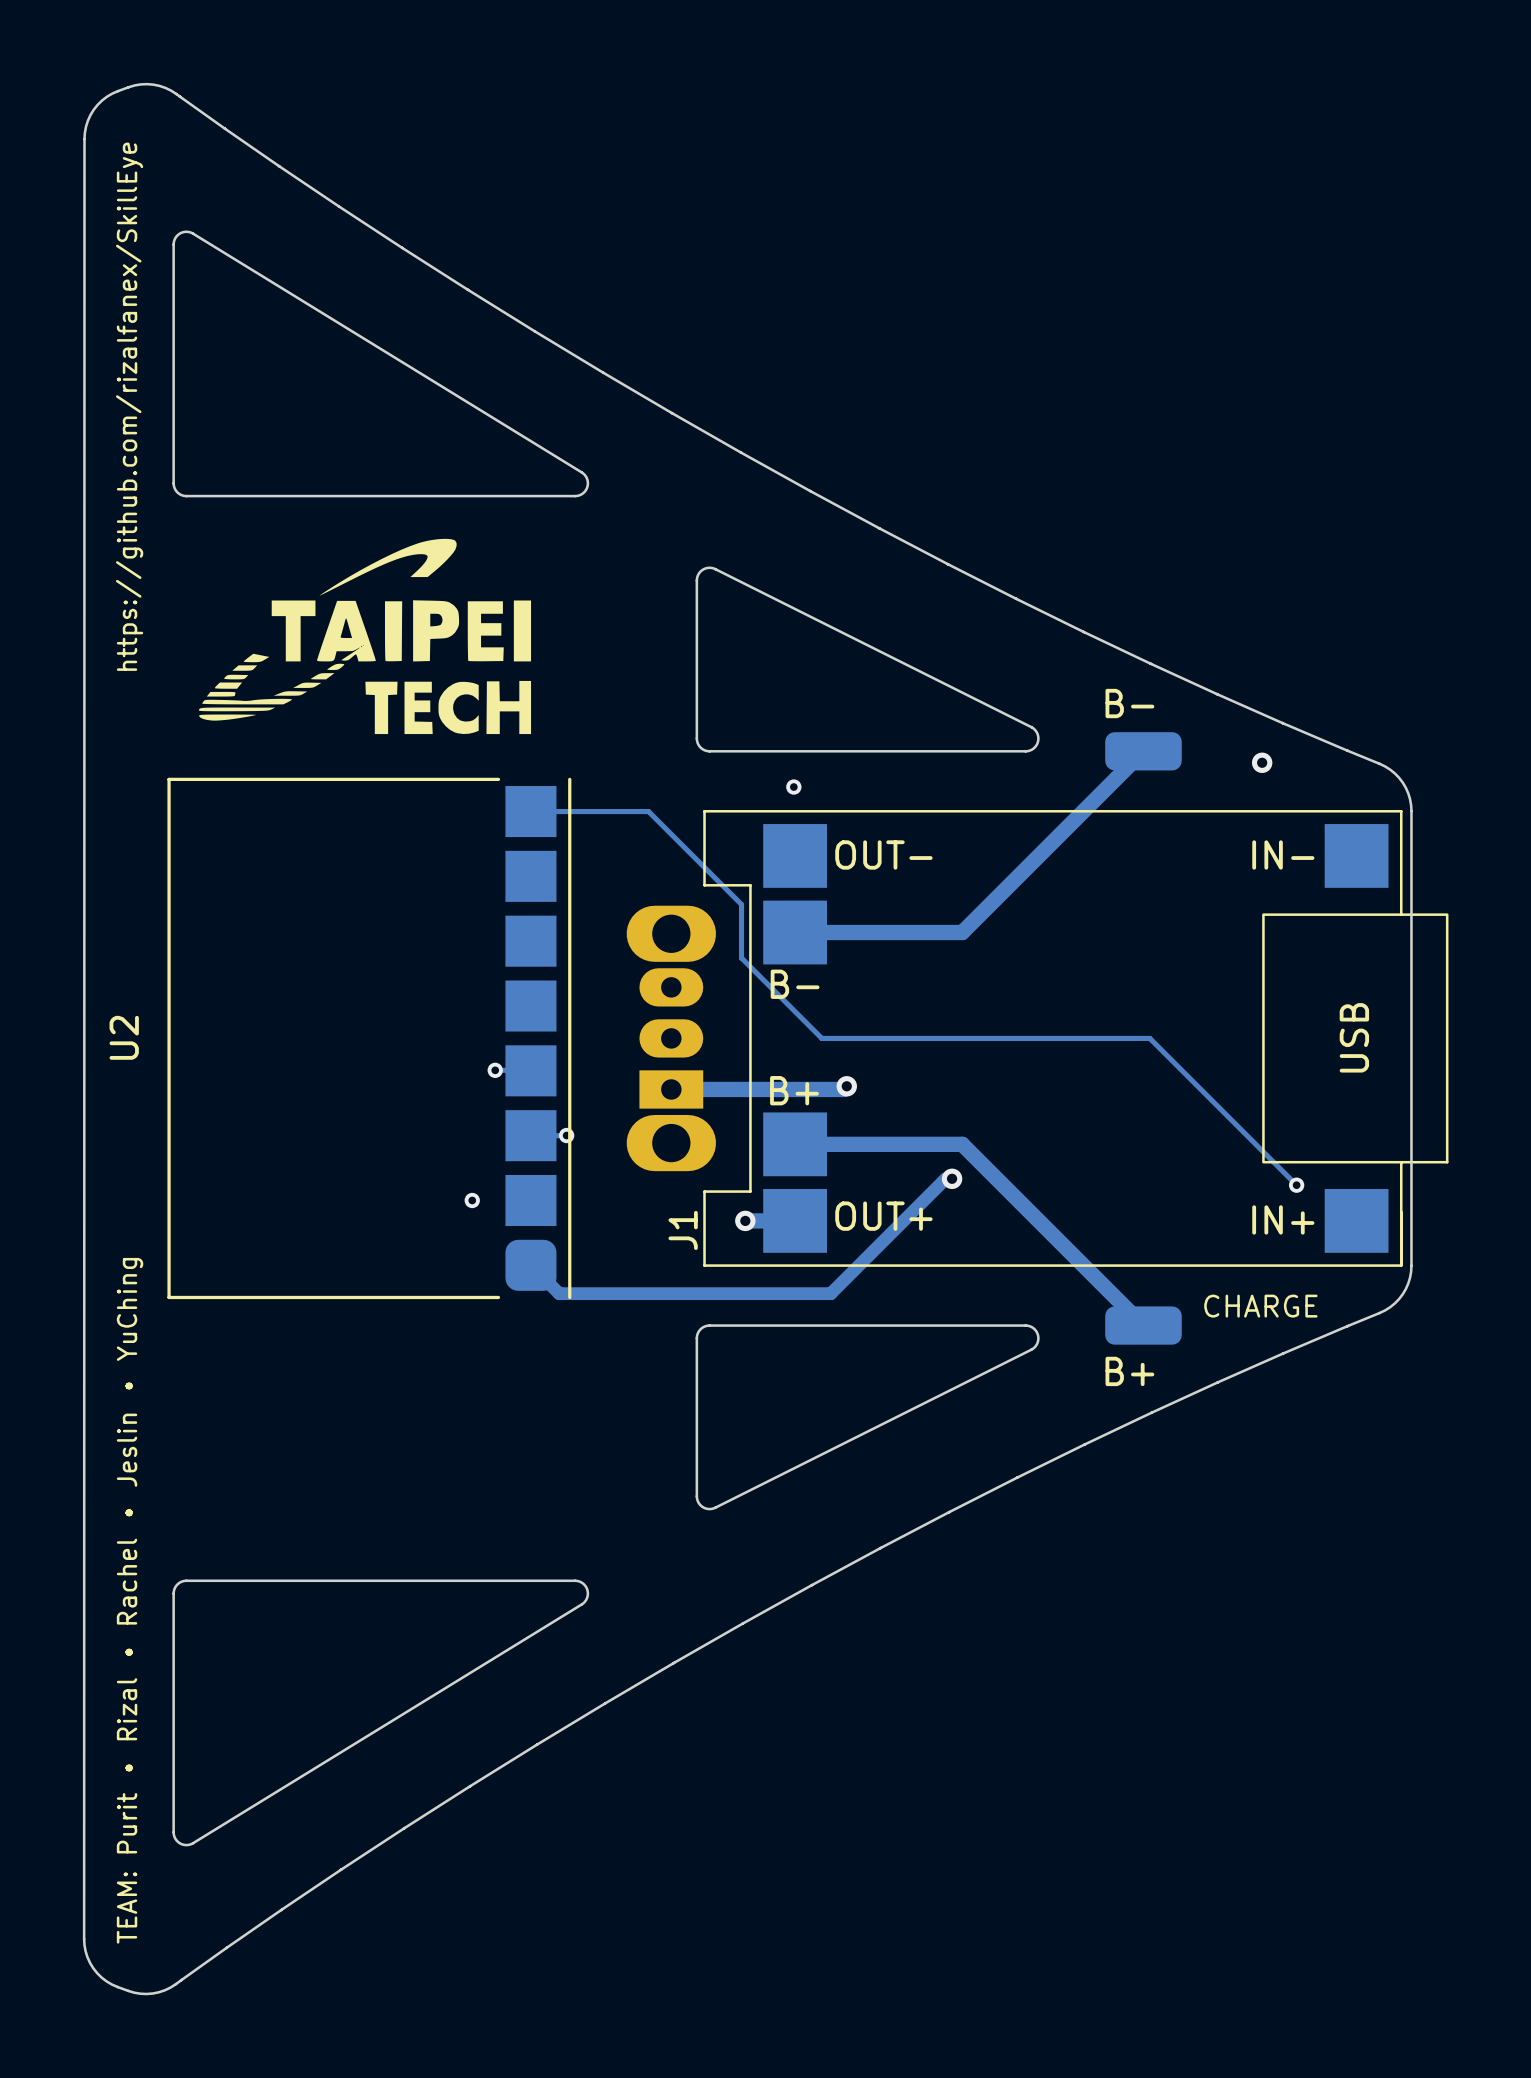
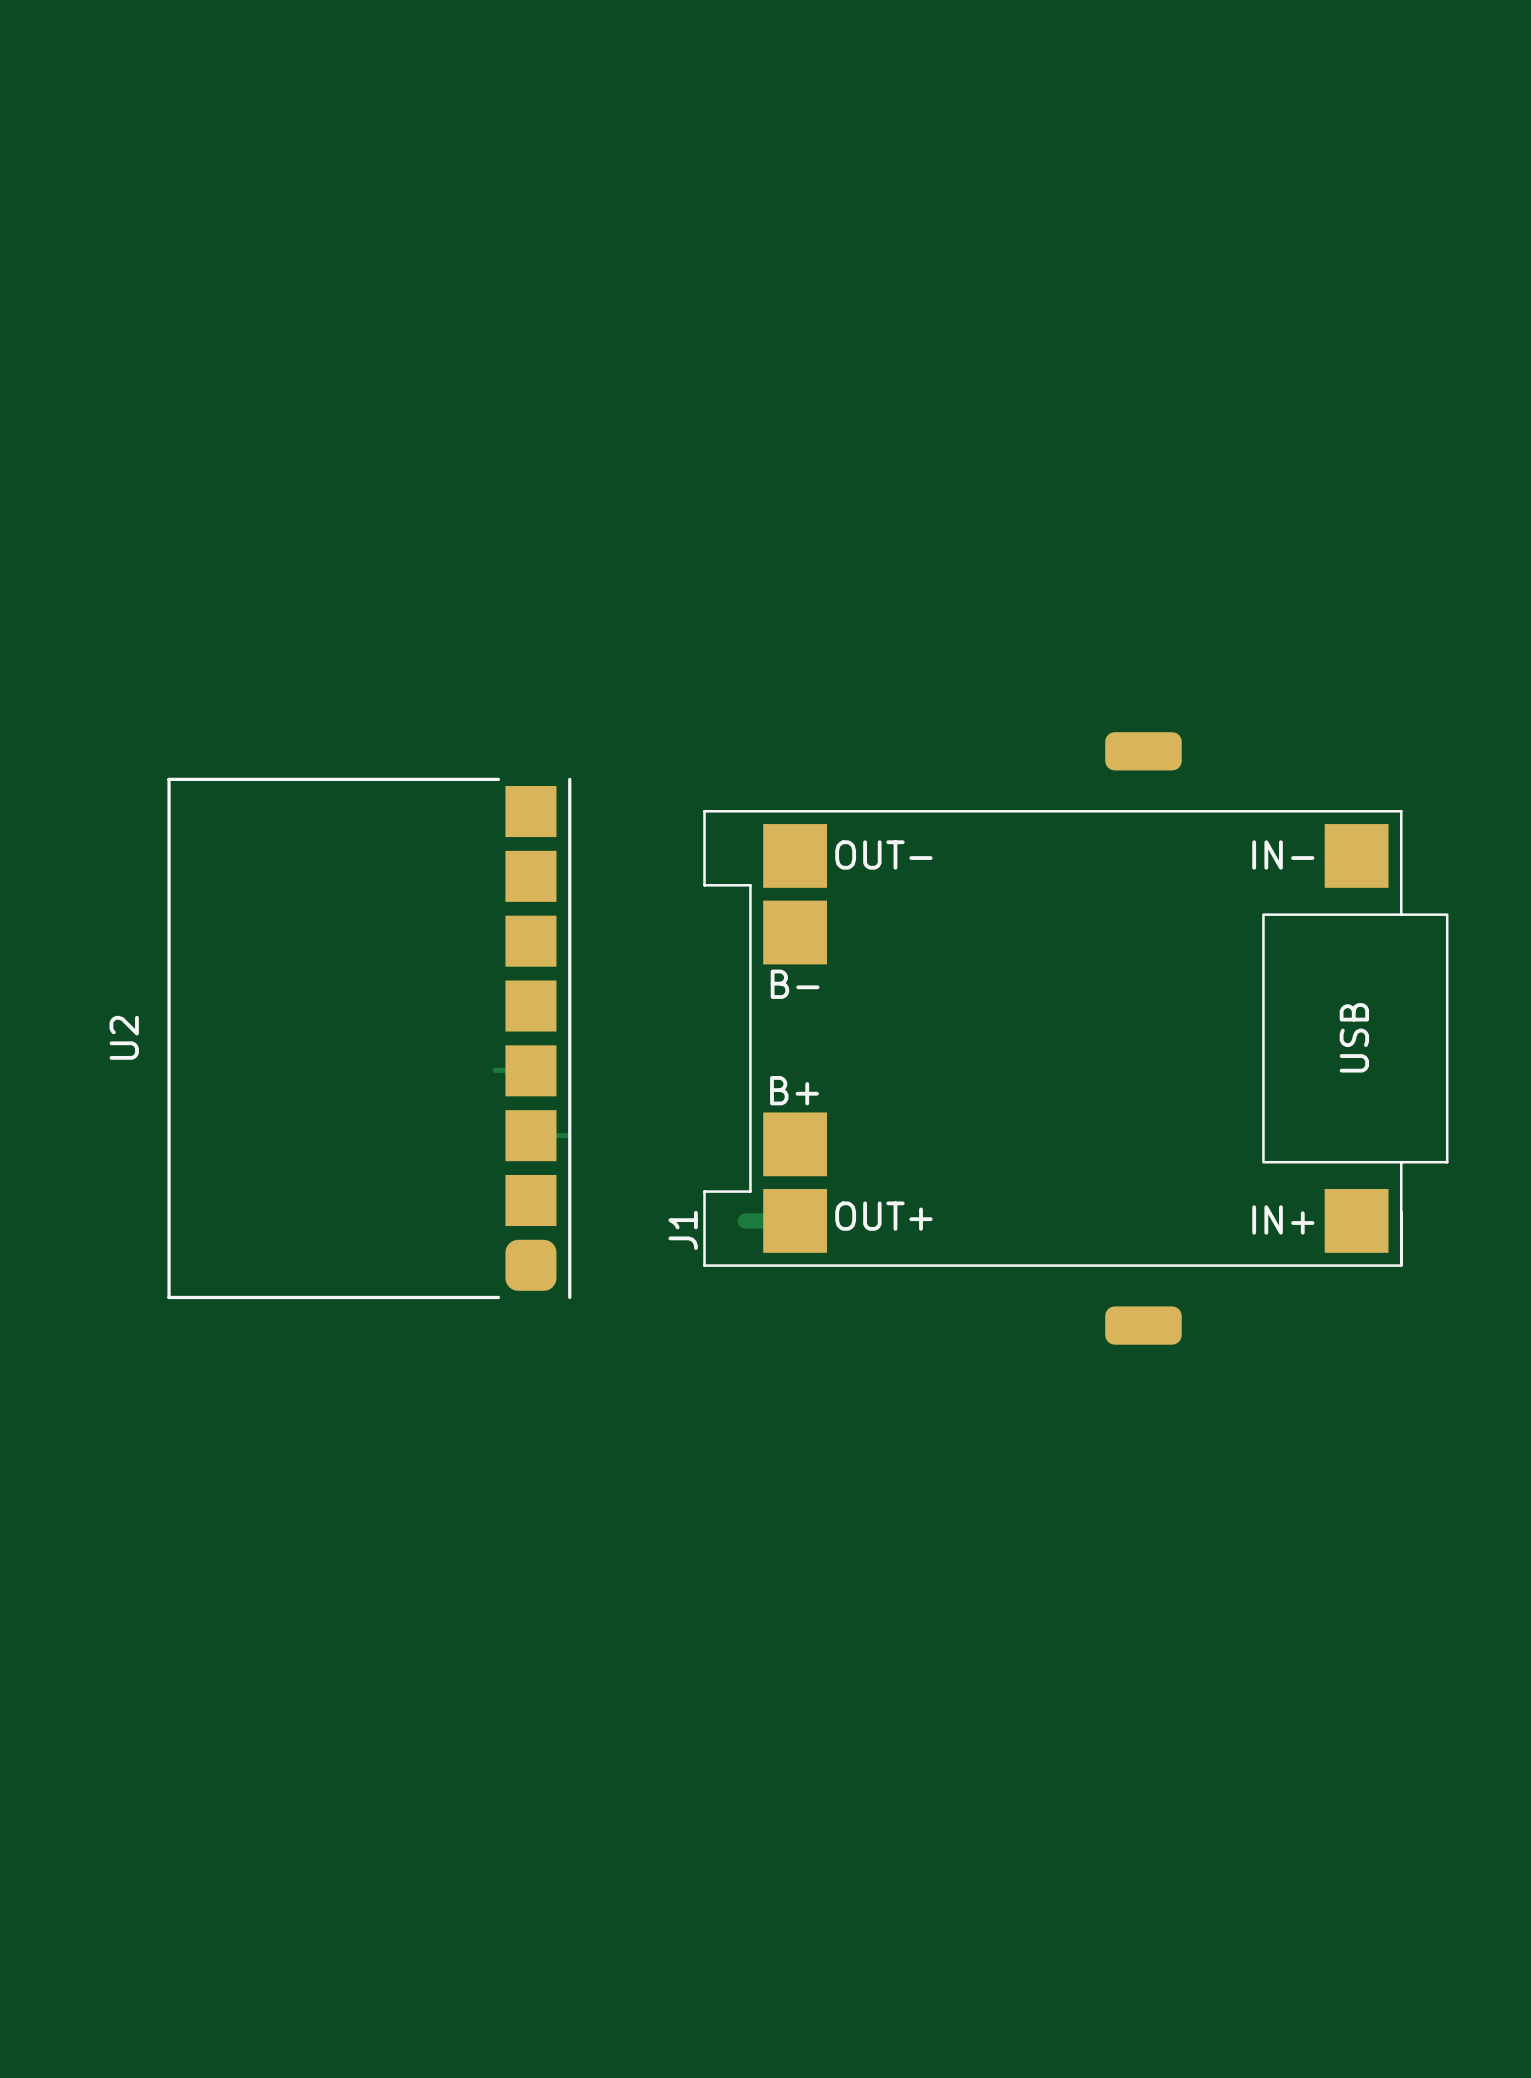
board edge: (128, 87) (112, 93) (97, 104) (87, 120) (84, 139) (84, 1939) (87, 1957) (93, 1968) (101, 1977) (111, 1984) (128, 1990) (146, 1993) (159, 1992) (170, 1987) (341, 1869) (537, 1744) (673, 1662) (811, 1585) (949, 1512) (1084, 1444) (1218, 1382) (1379, 1313) (1394, 1303) (1405, 1289) (1411, 1265) (1411, 811) (1405, 787) (1394, 773) (1385, 766) (1217, 694) (1083, 632) (947, 564) (810, 491) (671, 413) (467, 289) (338, 206) (171, 90) (153, 84) (140, 84) (128, 87) -> none
board edge: (193, 233) (581, 472) (587, 480) (586, 489) (581, 494) (575, 496) (186, 496) (180, 494) (175, 489) (173, 483) (173, 244) (175, 238) (180, 233) (185, 231) (193, 233) -> none
text: https://github.com/rizalfanex/SkillEye (129, 406) -> none
drawing: [199, 538, 532, 735] -> none
board edge: (715, 569) (1031, 727) (1037, 733) (1036, 744) (1031, 749) (1025, 751) (709, 751) (703, 749) (698, 744) (696, 738) (696, 578) (699, 572) (704, 568) (715, 569) -> none
text: B- (1129, 703) -> none
track: (1143, 751) (962, 932) (795, 932) -> none
via: (1262, 762) -> none
via: (793, 787) -> none
track: (530, 811) (648, 811) (741, 904) (741, 958) (821, 1038) (1149, 1038) (1296, 1185) -> none
part: (671, 1038) -> none
via: (495, 1070) -> none
track: (846, 1086) (843, 1089) (671, 1089) -> none
via: (846, 1086) -> none
via: (566, 1135) -> none
track: (795, 1144) (962, 1144) (1143, 1325) -> none
track: (952, 1178) (945, 1178) (830, 1293) (559, 1293) (530, 1265) -> none
via: (952, 1178) -> none
via: (1296, 1185) -> none
via: (472, 1200) -> none
via: (745, 1220) -> none
text: CHARGE (1260, 1306) -> none
board edge: (1025, 1325) (709, 1325) (703, 1327) (698, 1331) (696, 1338) (696, 1496) (698, 1502) (705, 1508) (715, 1507) (1031, 1349) (1037, 1343) (1038, 1335) (1032, 1327) (1025, 1325) -> none
text: B+ (1129, 1371) -> none
board edge: (575, 1580) (186, 1580) (180, 1582) (175, 1587) (173, 1593) (173, 1832) (175, 1839) (182, 1844) (193, 1843) (581, 1604) (587, 1598) (587, 1590) (582, 1583) (575, 1580) -> none
text: TEAM: Purit • Rizal • Rachel • Jeslin • YuChing (130, 1600) -> none

